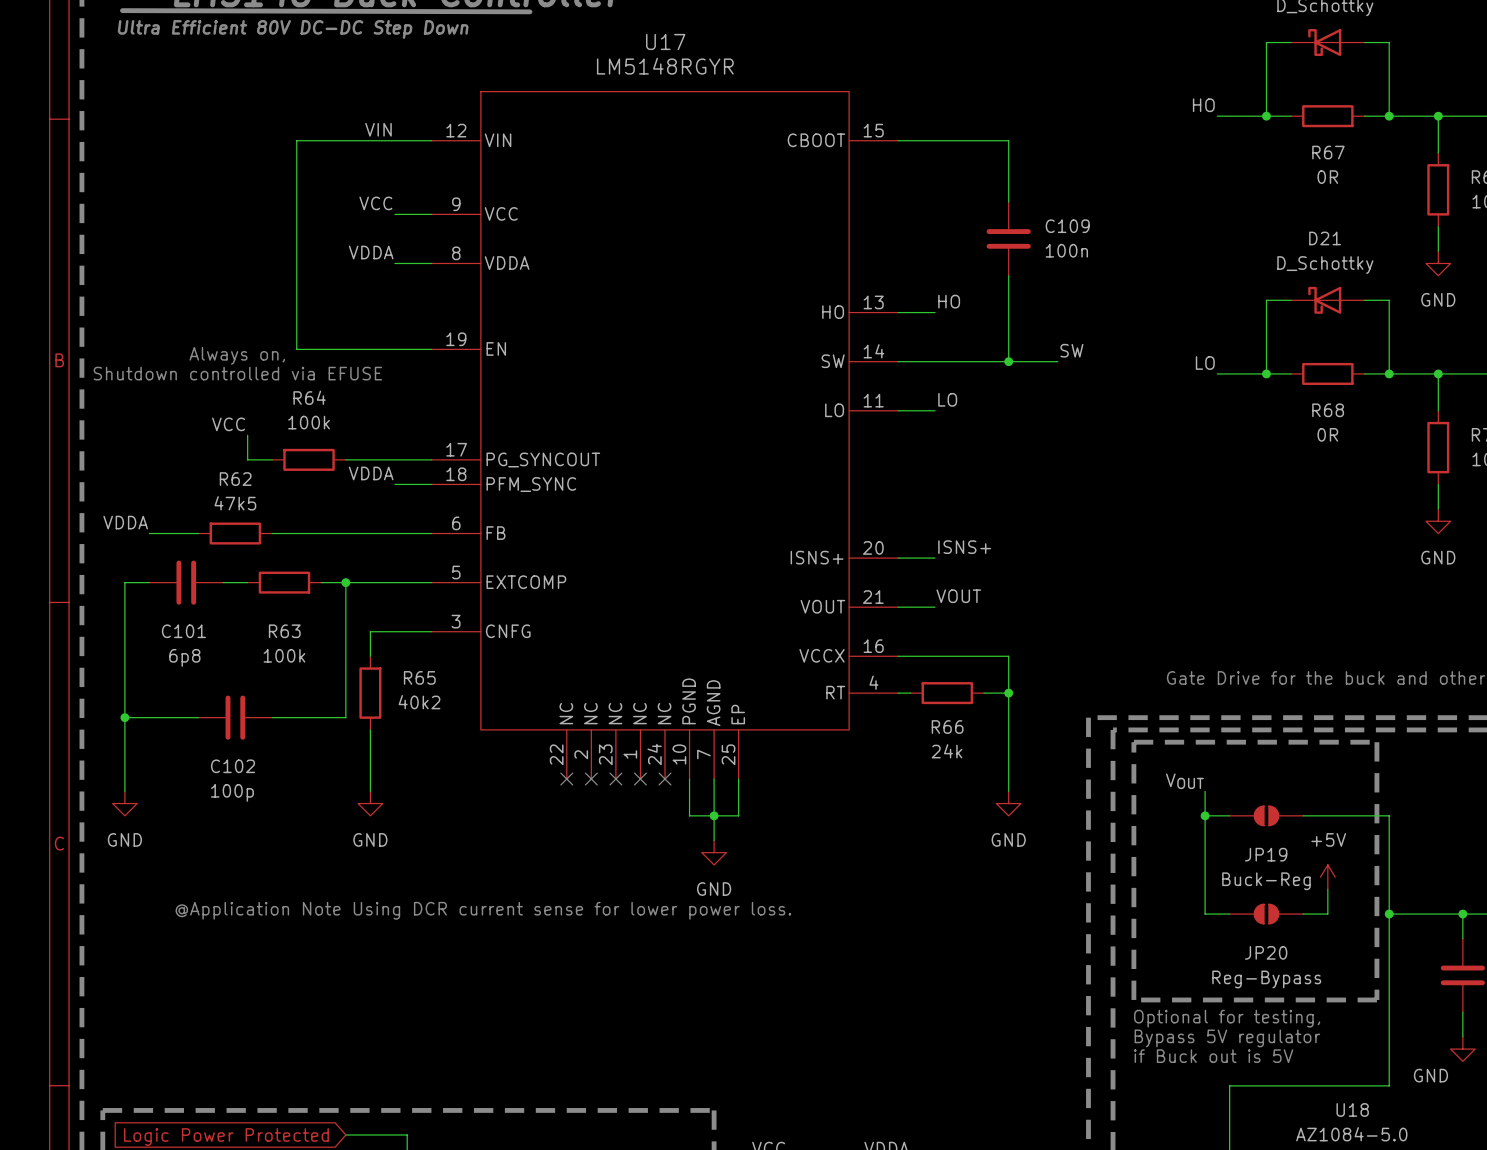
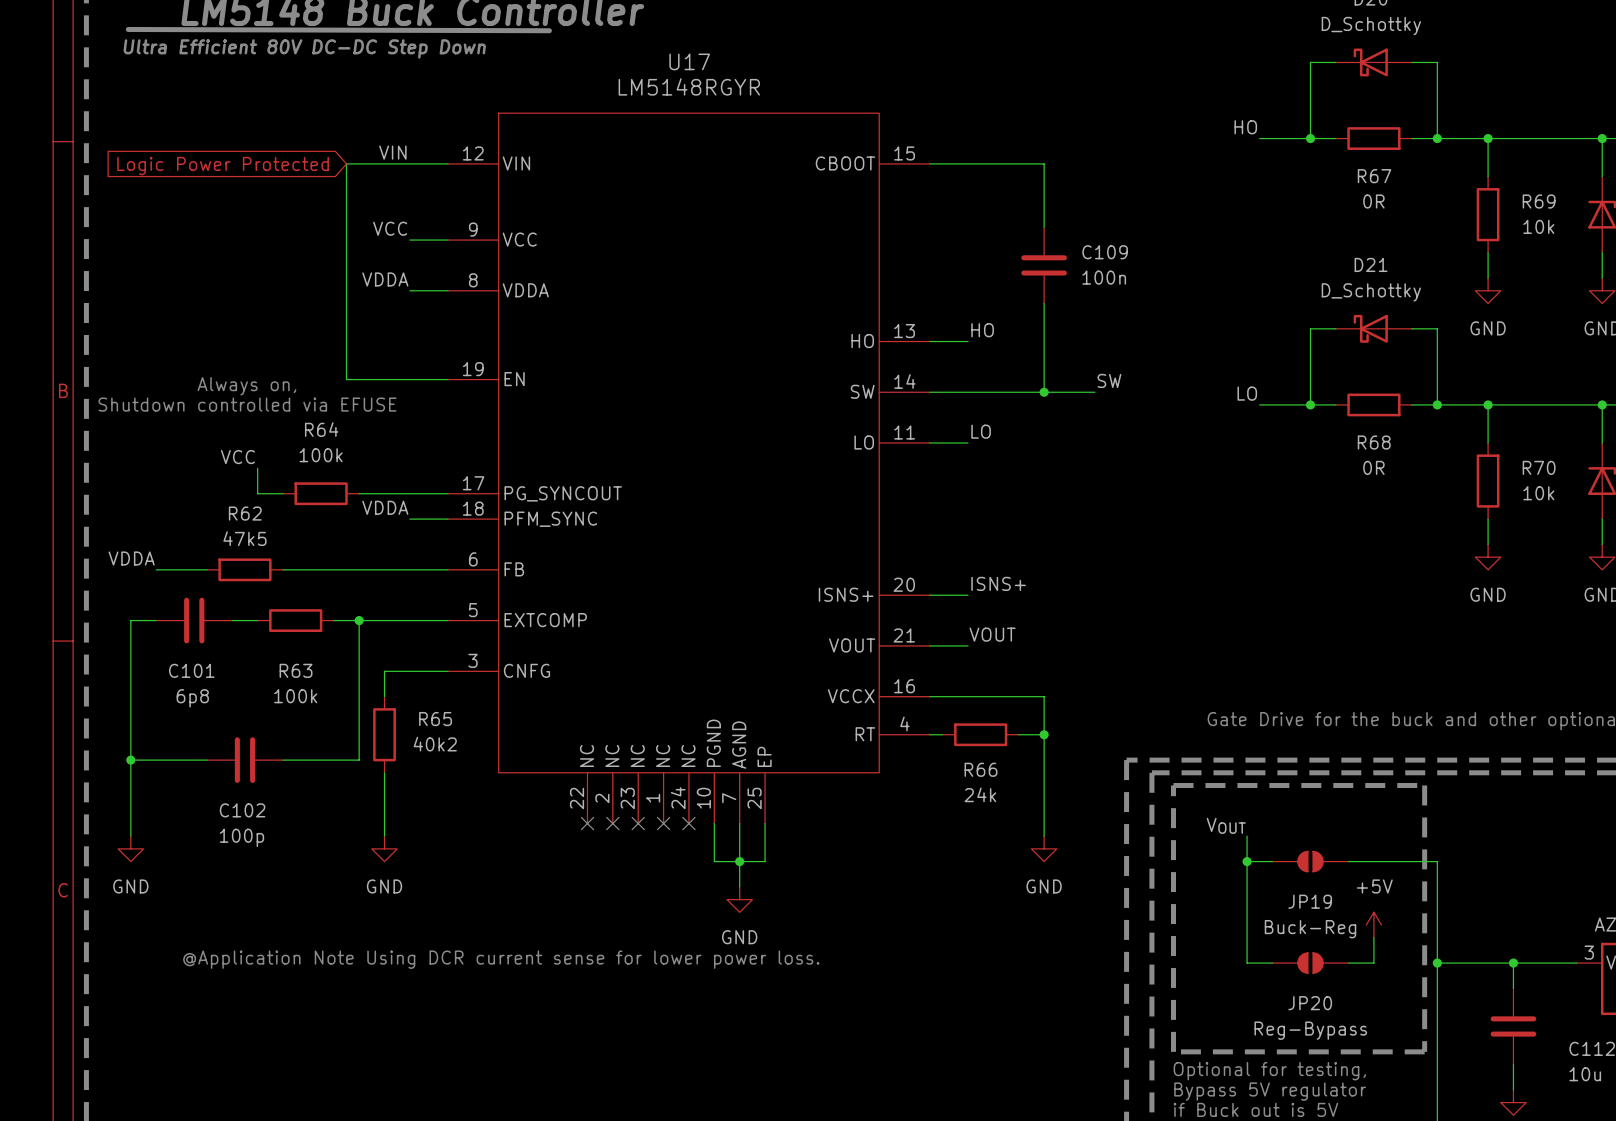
wire: (333, 140) (296, 140) (296, 349) (333, 349) -> (346, 163) (346, 379)
global label: none -> Logic Power Protected (223, 166)

